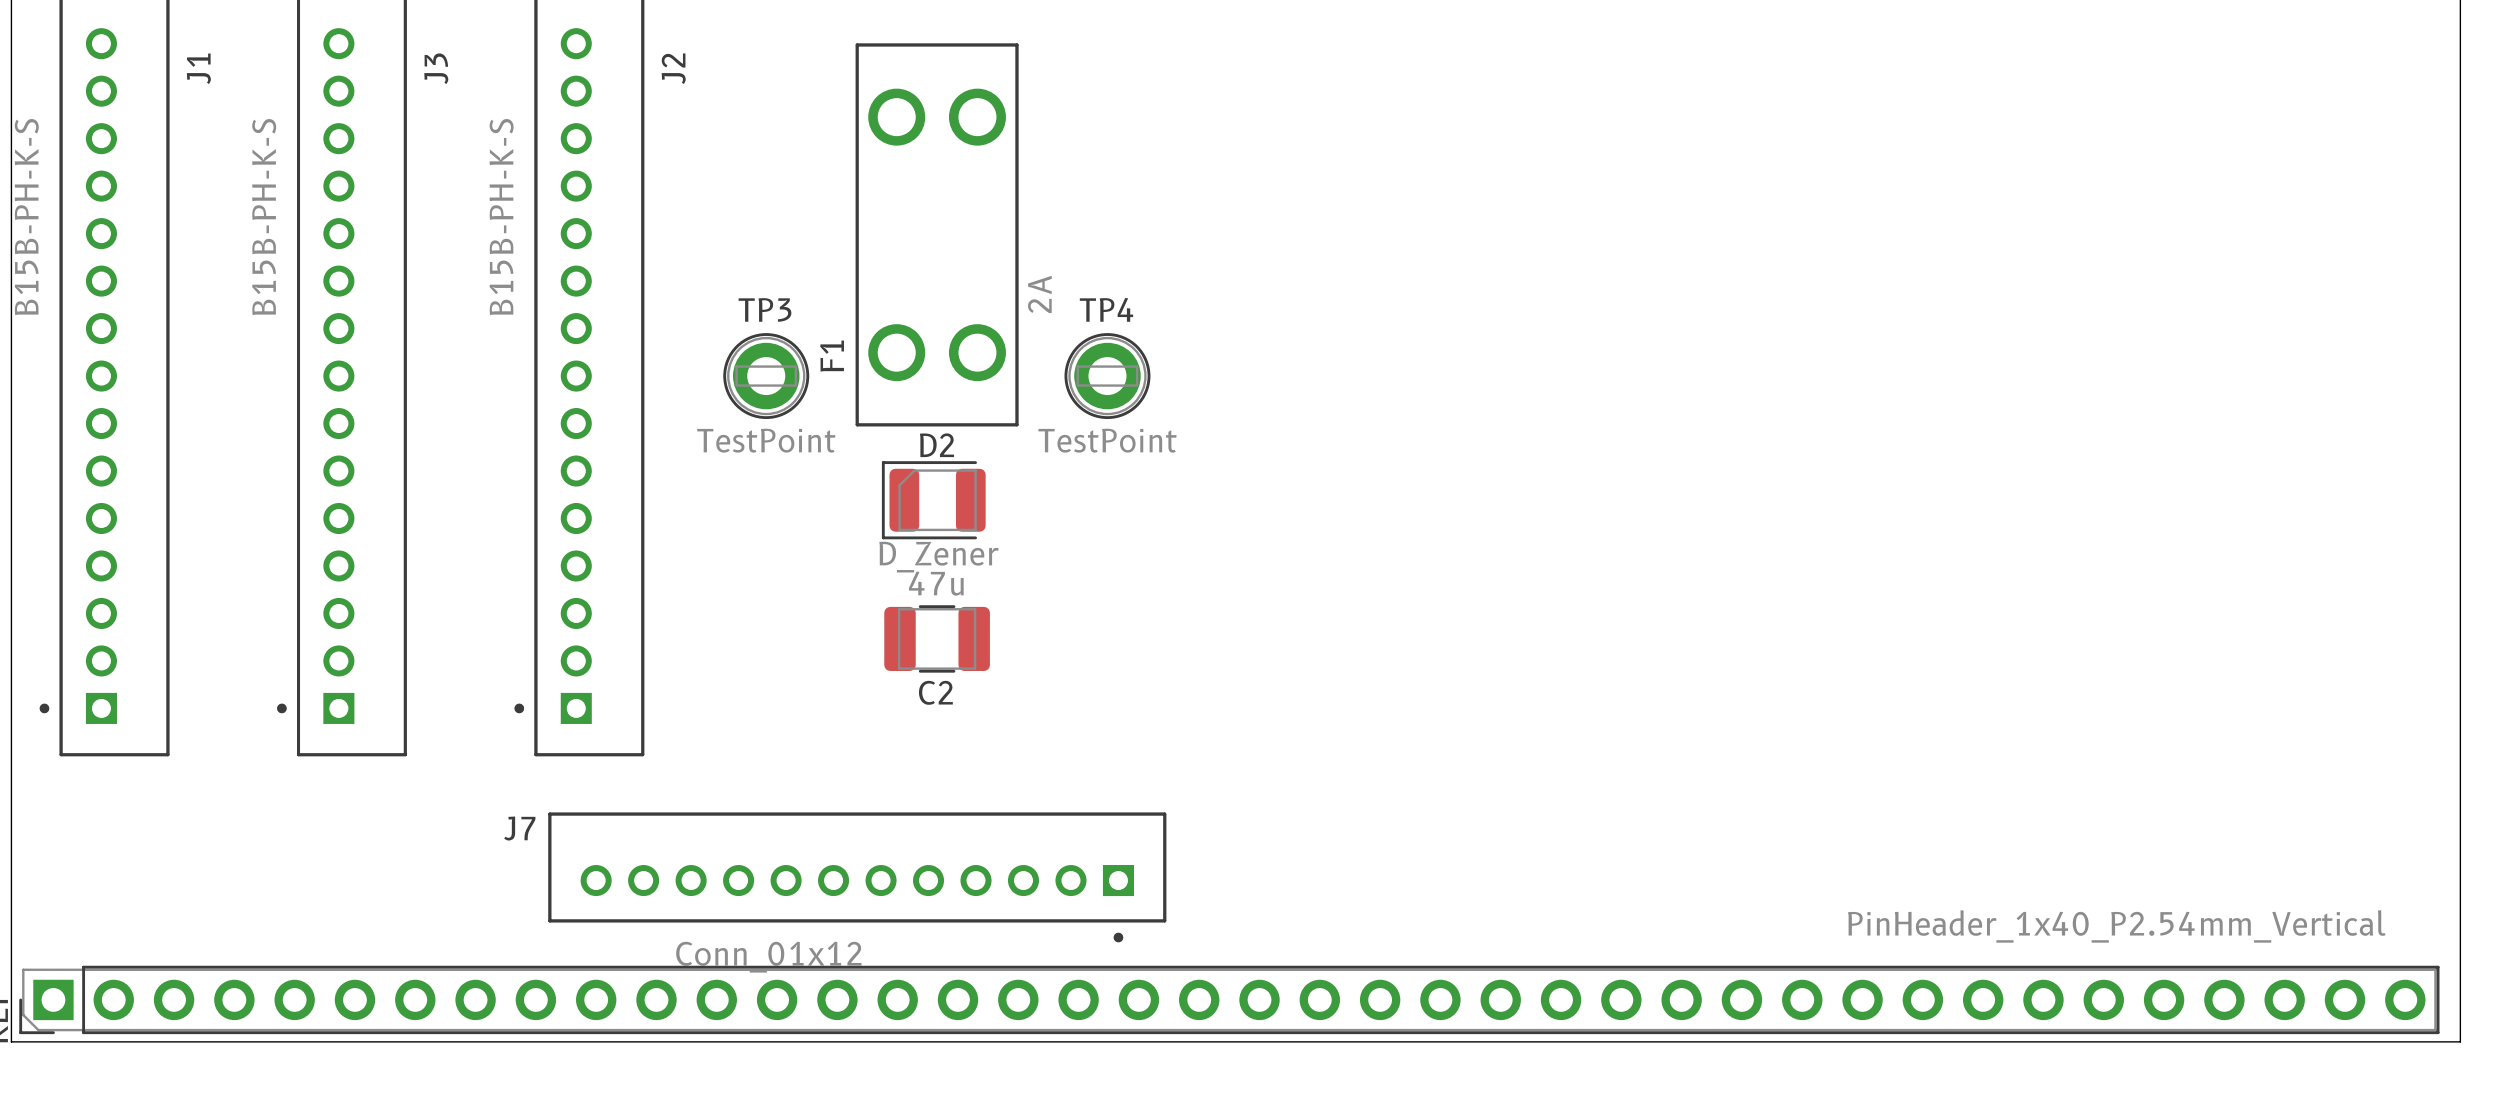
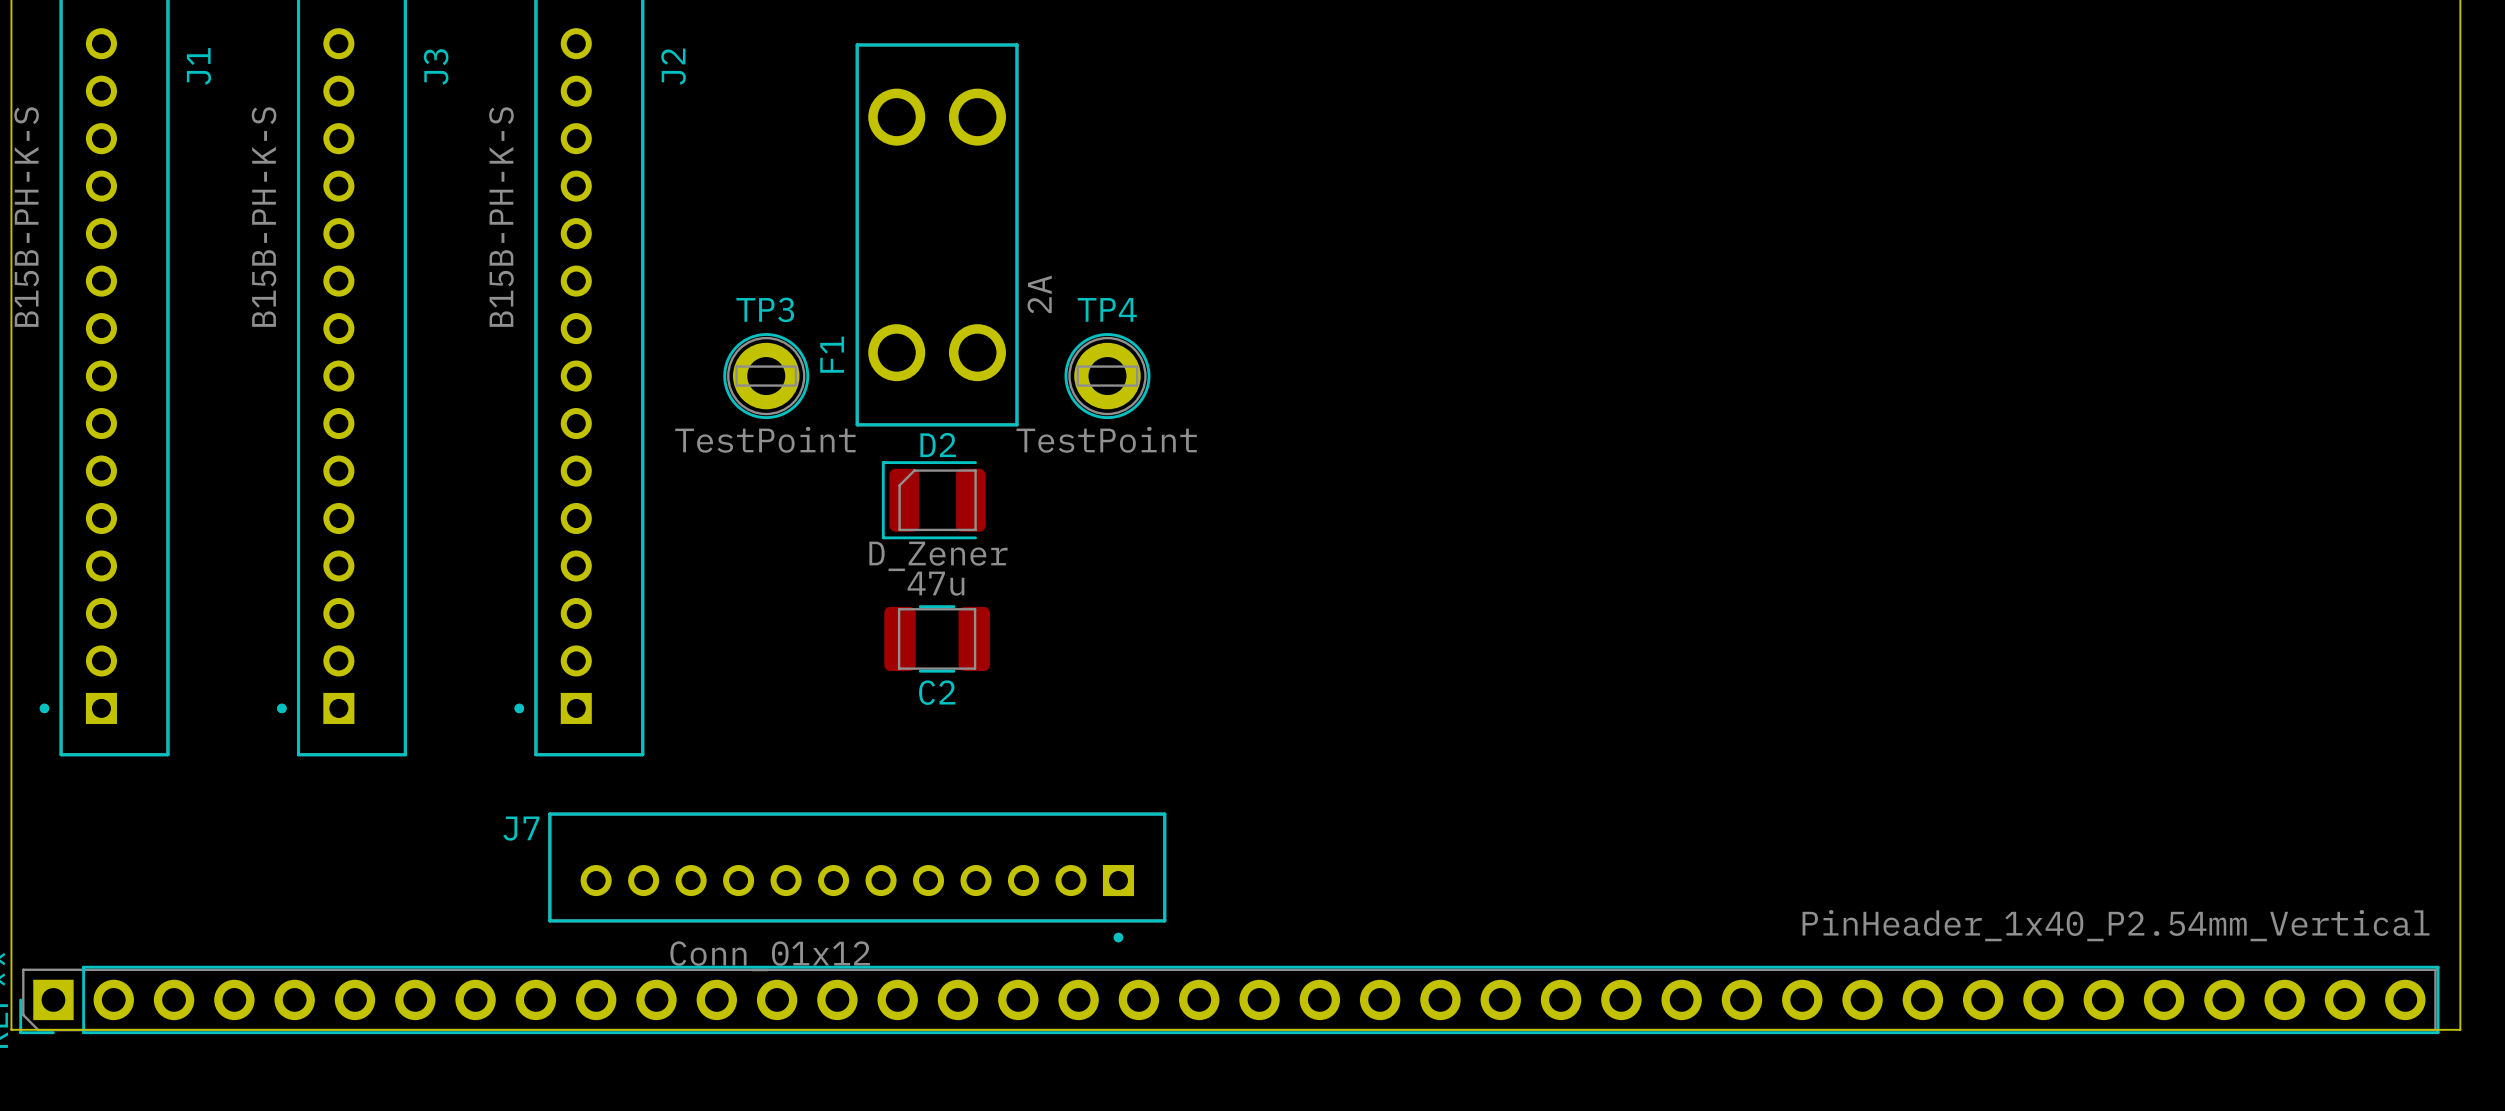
board edge: (11, 1029) (11, 1041) (2460, 1041) (2460, 1029) -> (11, 1029) (2460, 1029)

